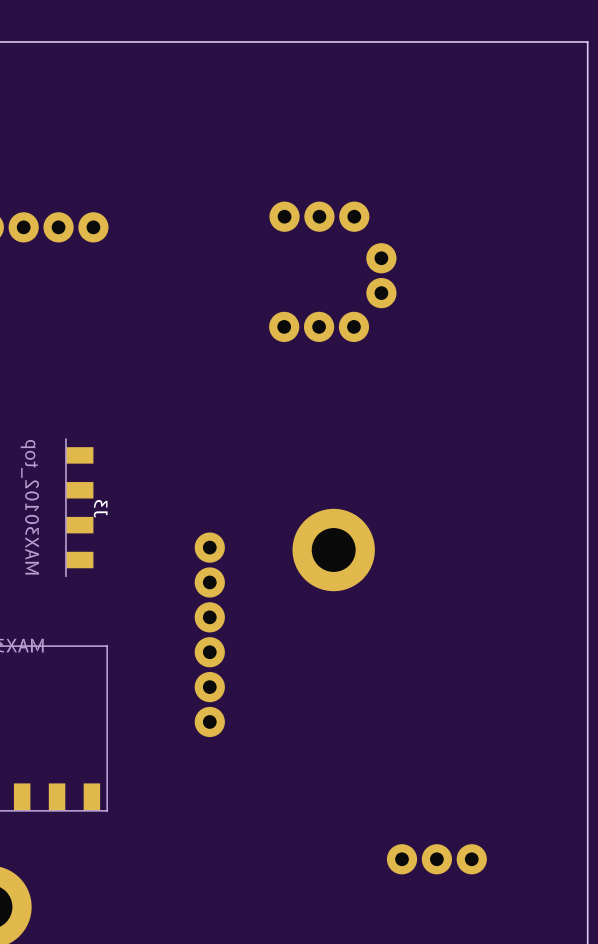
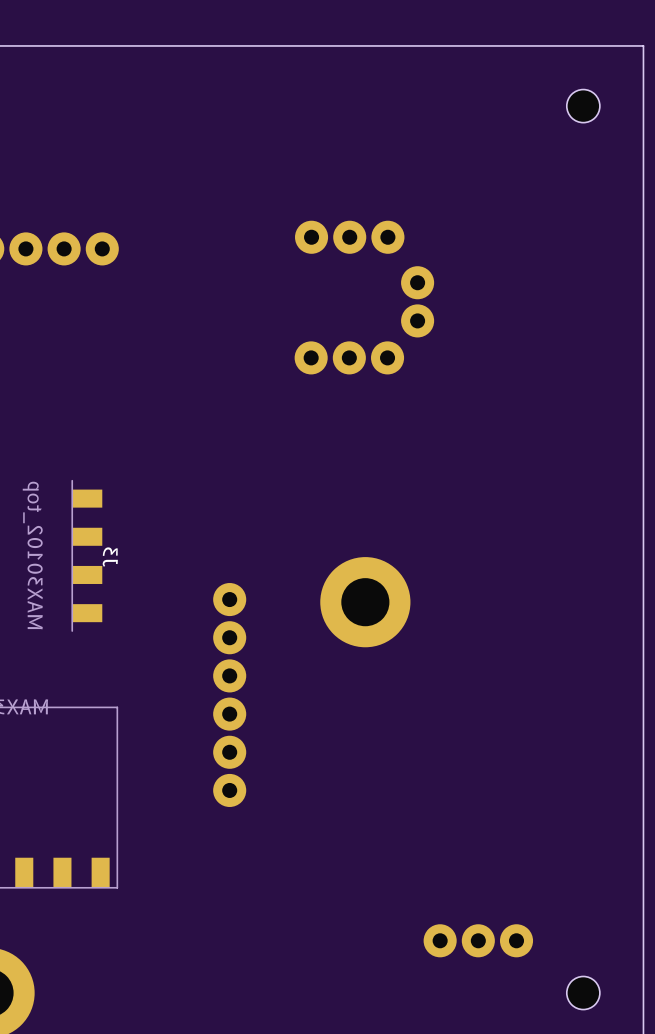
part: none -> (583, 106)
part: none -> (583, 993)

